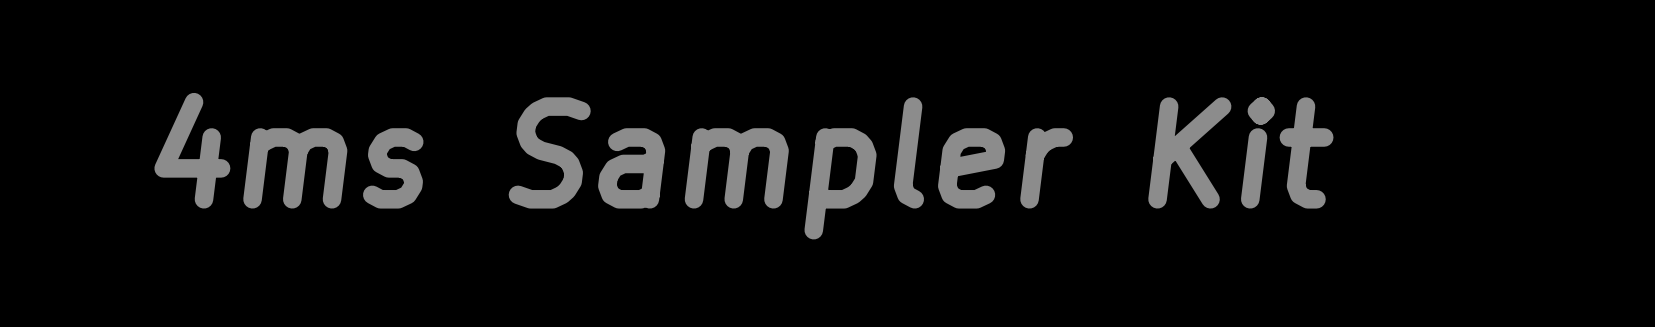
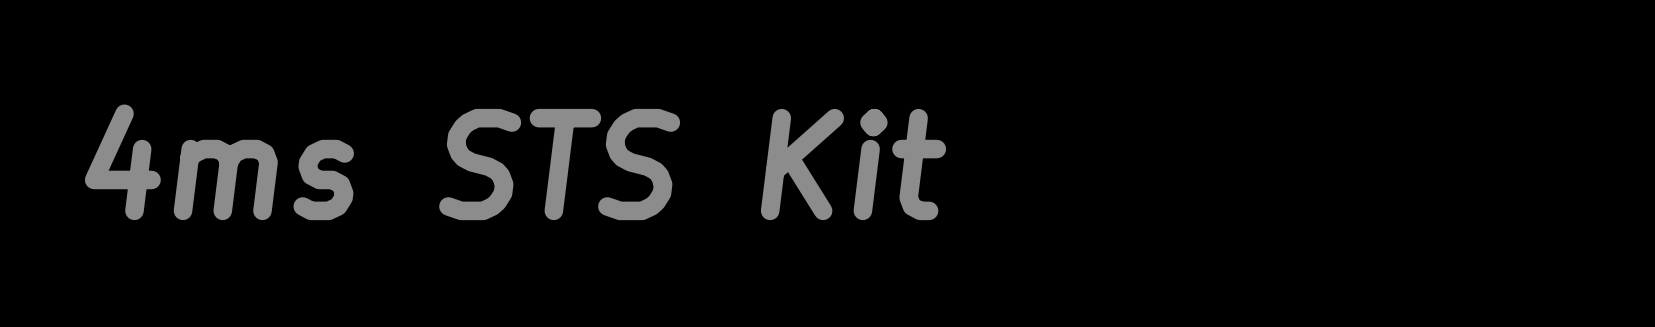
text: 4ms Sampler Kit (743, 166) -> 4ms STS Kit (515, 162)

